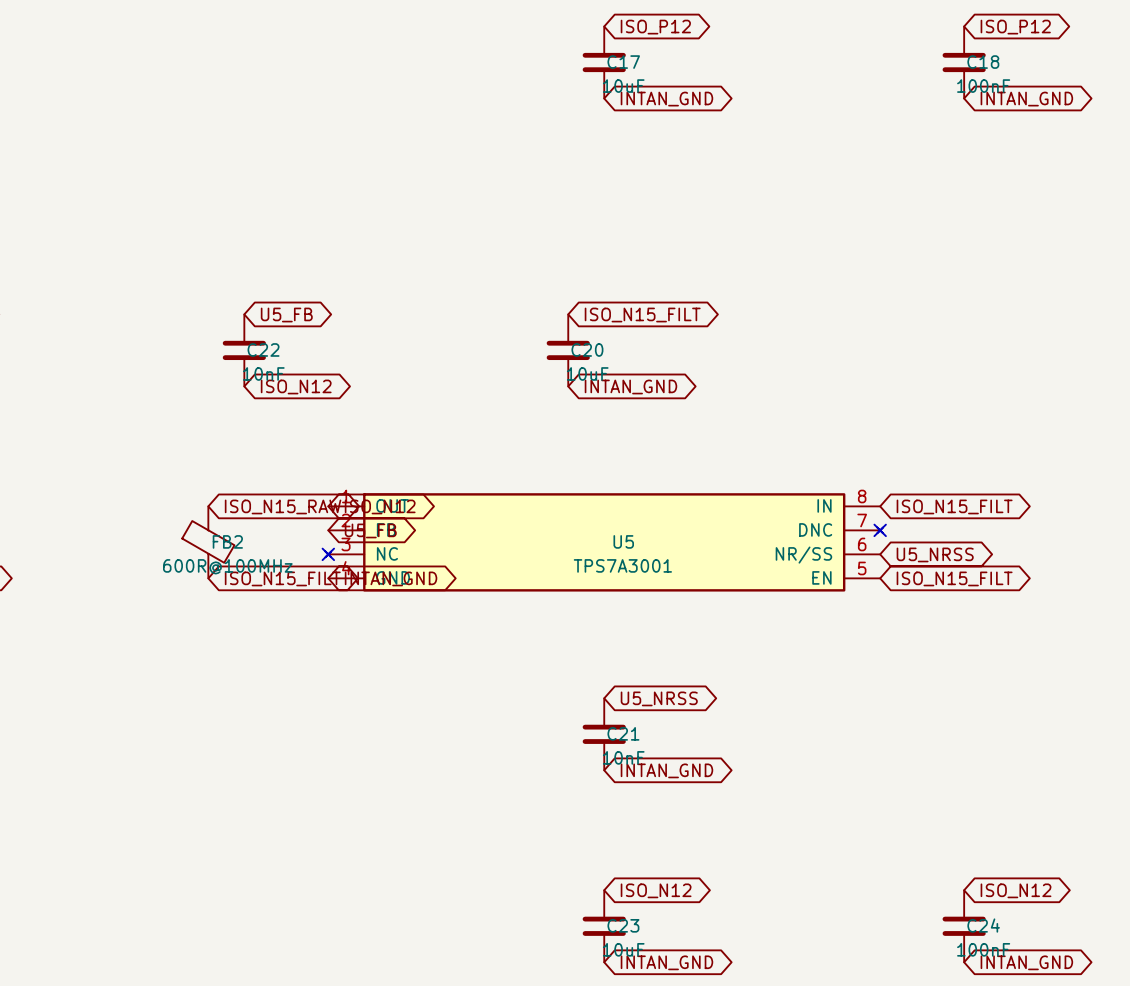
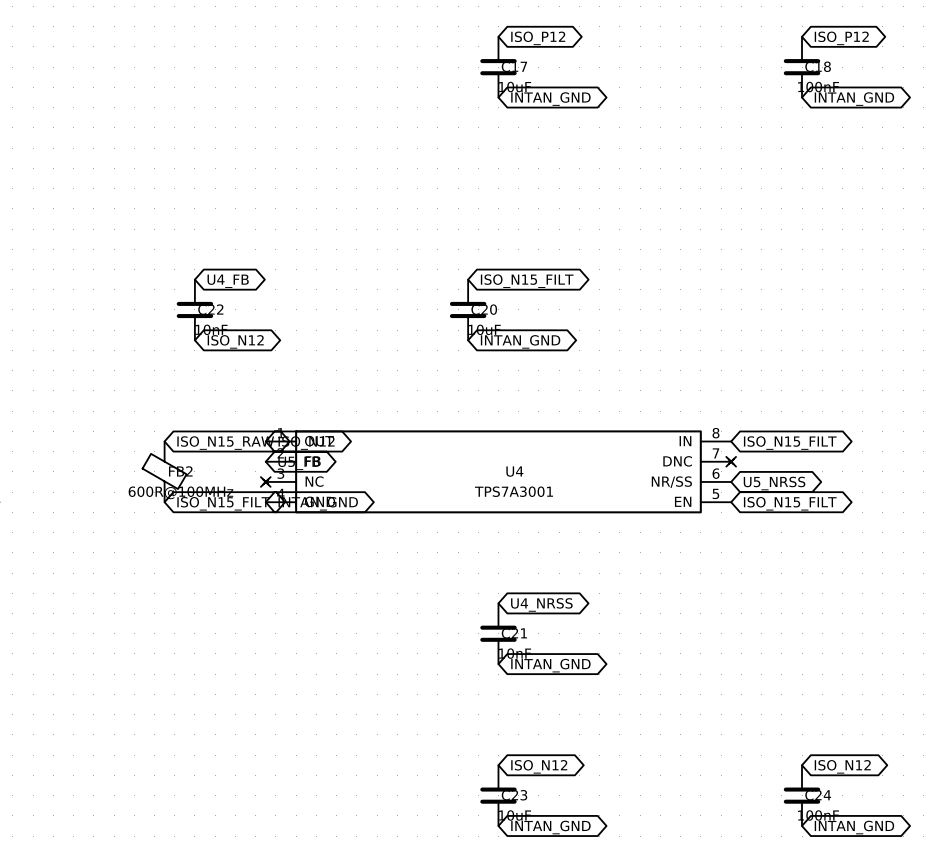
global label: U5_FB (286, 315) -> U4_FB (228, 281)
U5 name: U5 (623, 541) -> U4 (514, 471)
global label: U5_NRSS (659, 698) -> U4_NRSS (541, 604)

